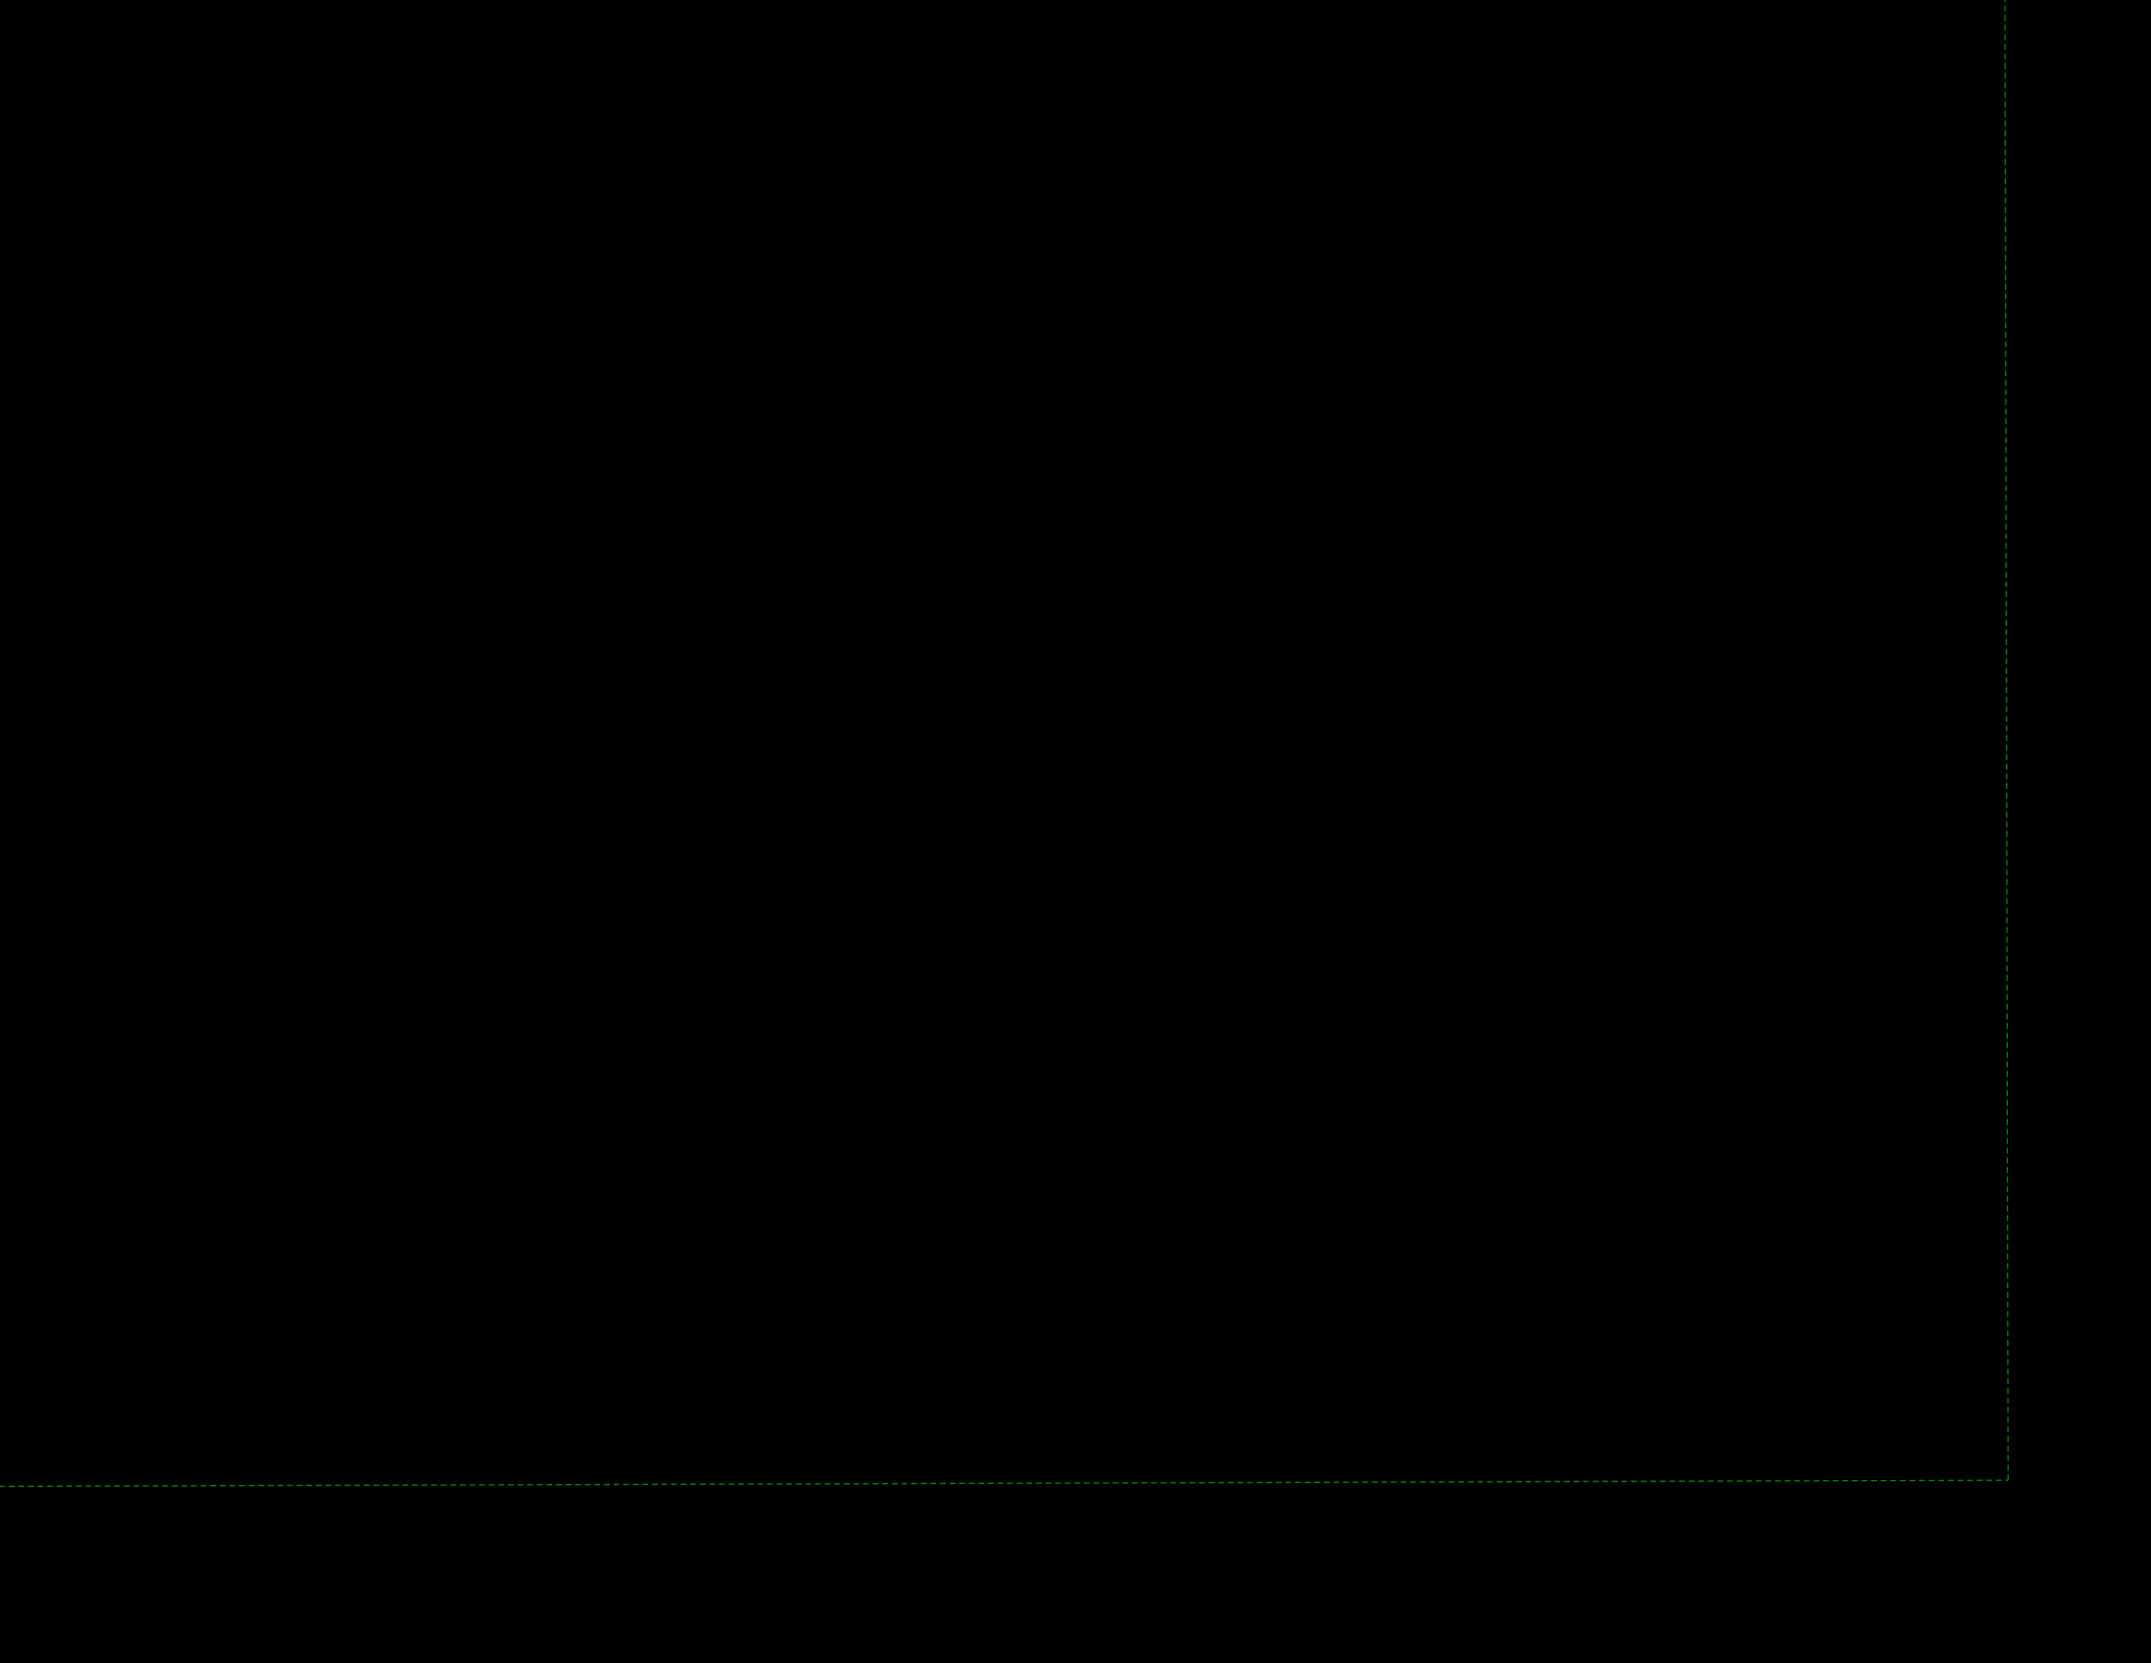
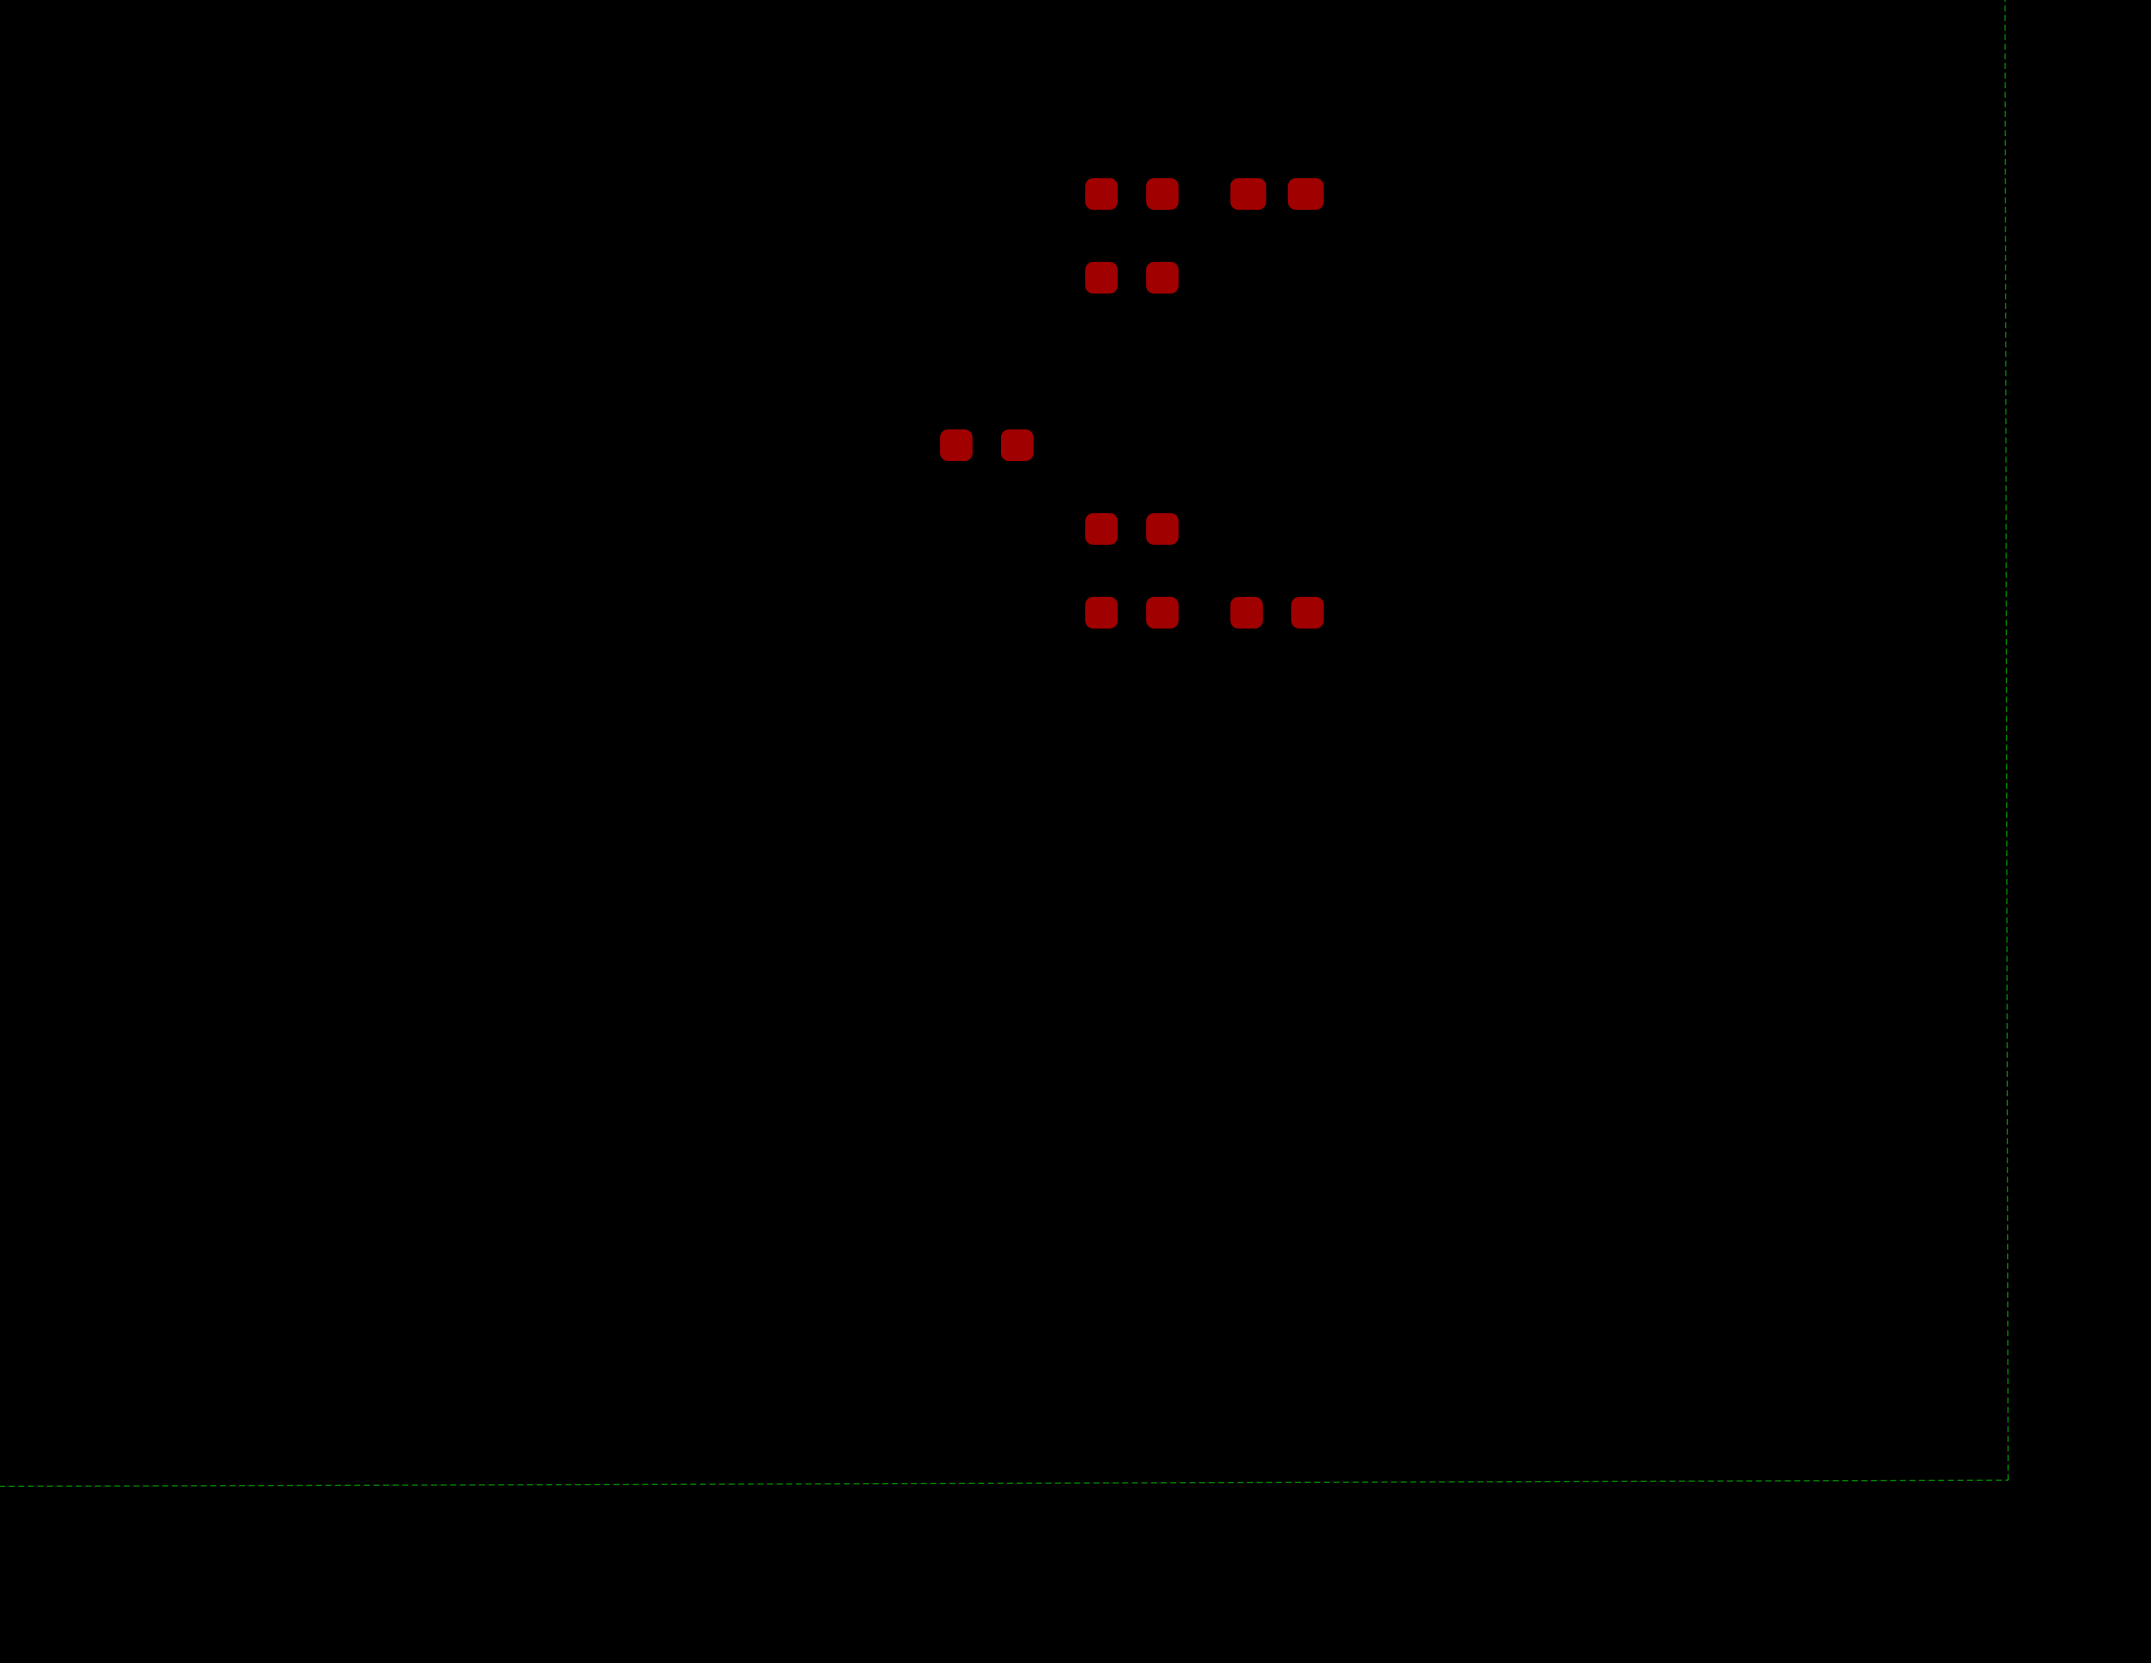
part: none -> (1131, 193)
part: none -> (1277, 193)
part: none -> (1131, 277)
part: none -> (986, 445)
part: none -> (1131, 528)
part: none -> (1131, 612)
part: none -> (1277, 612)

